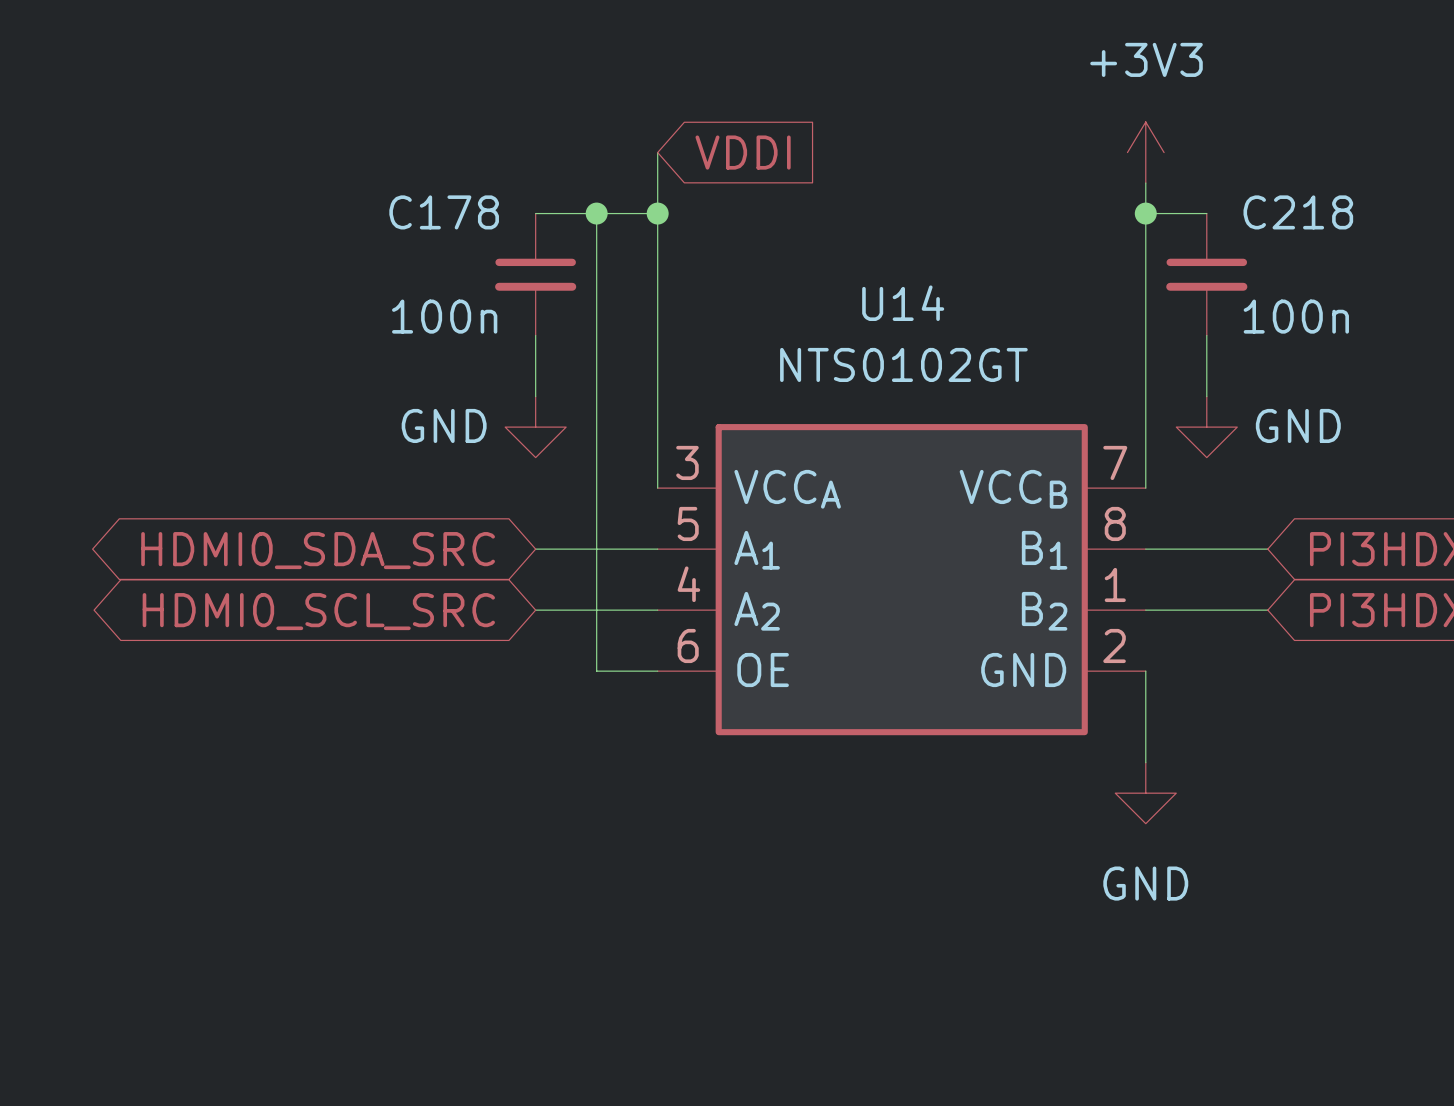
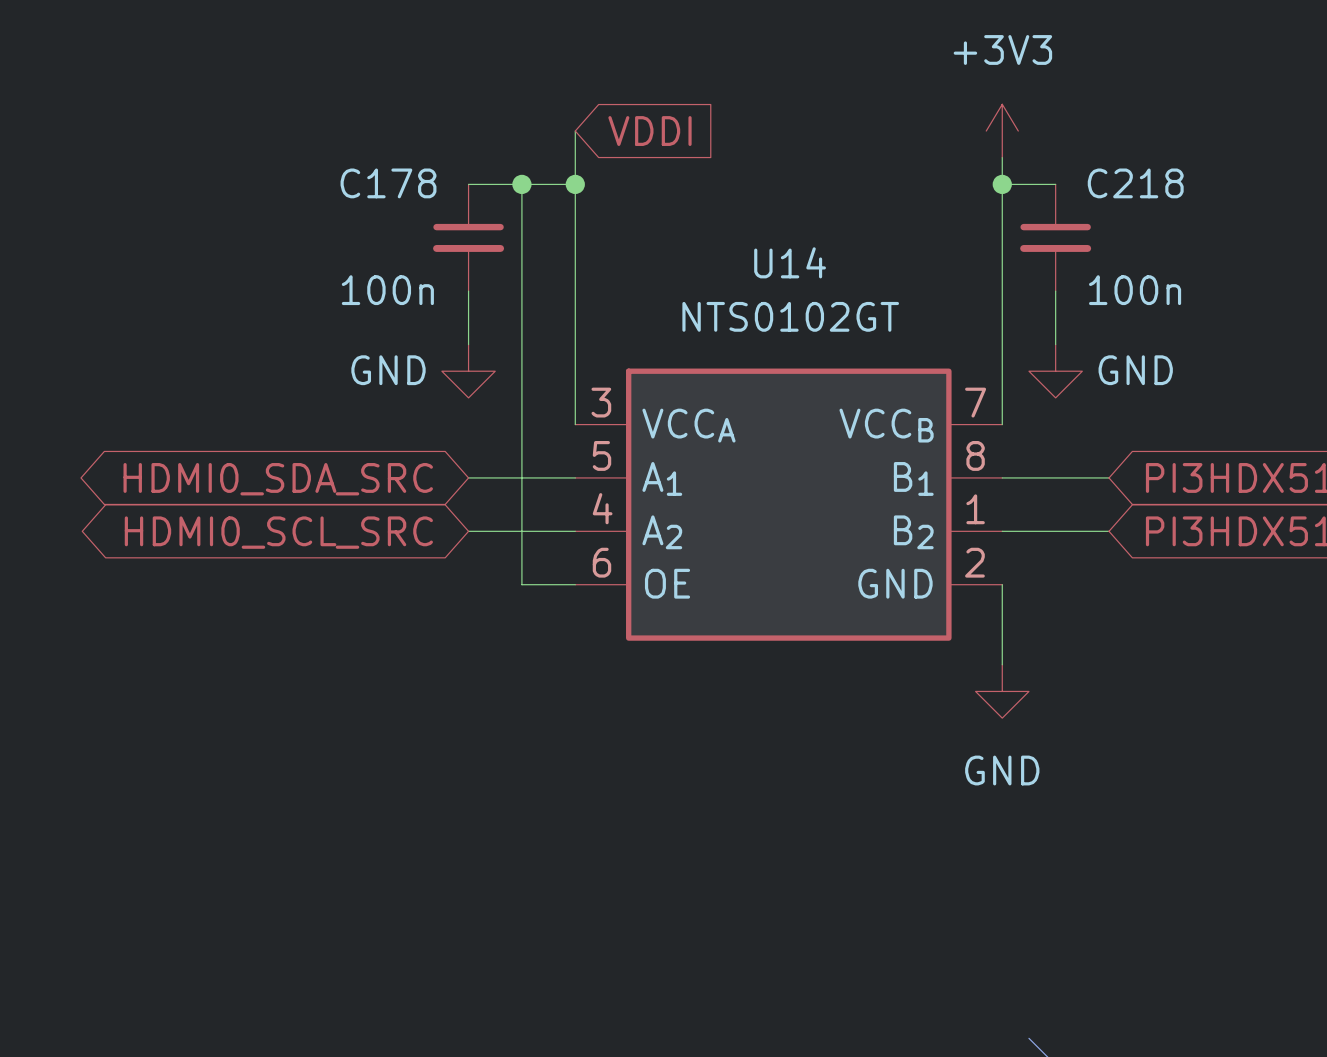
C178 text position: 100n (444, 316) -> 100n (387, 290)
C218 text position: 100n (1296, 316) -> 100n (1135, 290)

